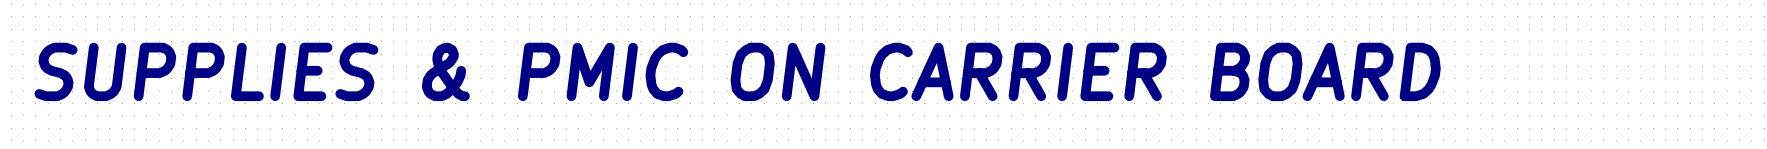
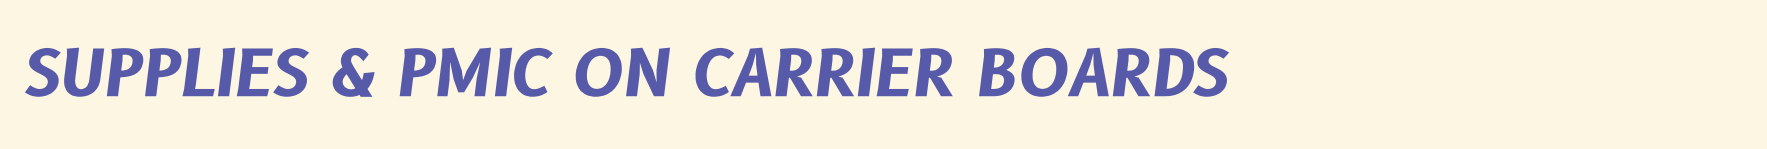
text: SUPPLIES & PMIC ON CARRIER BOARD (737, 71) -> SUPPLIES & PMIC ON CARRIER BOARDS (626, 72)

